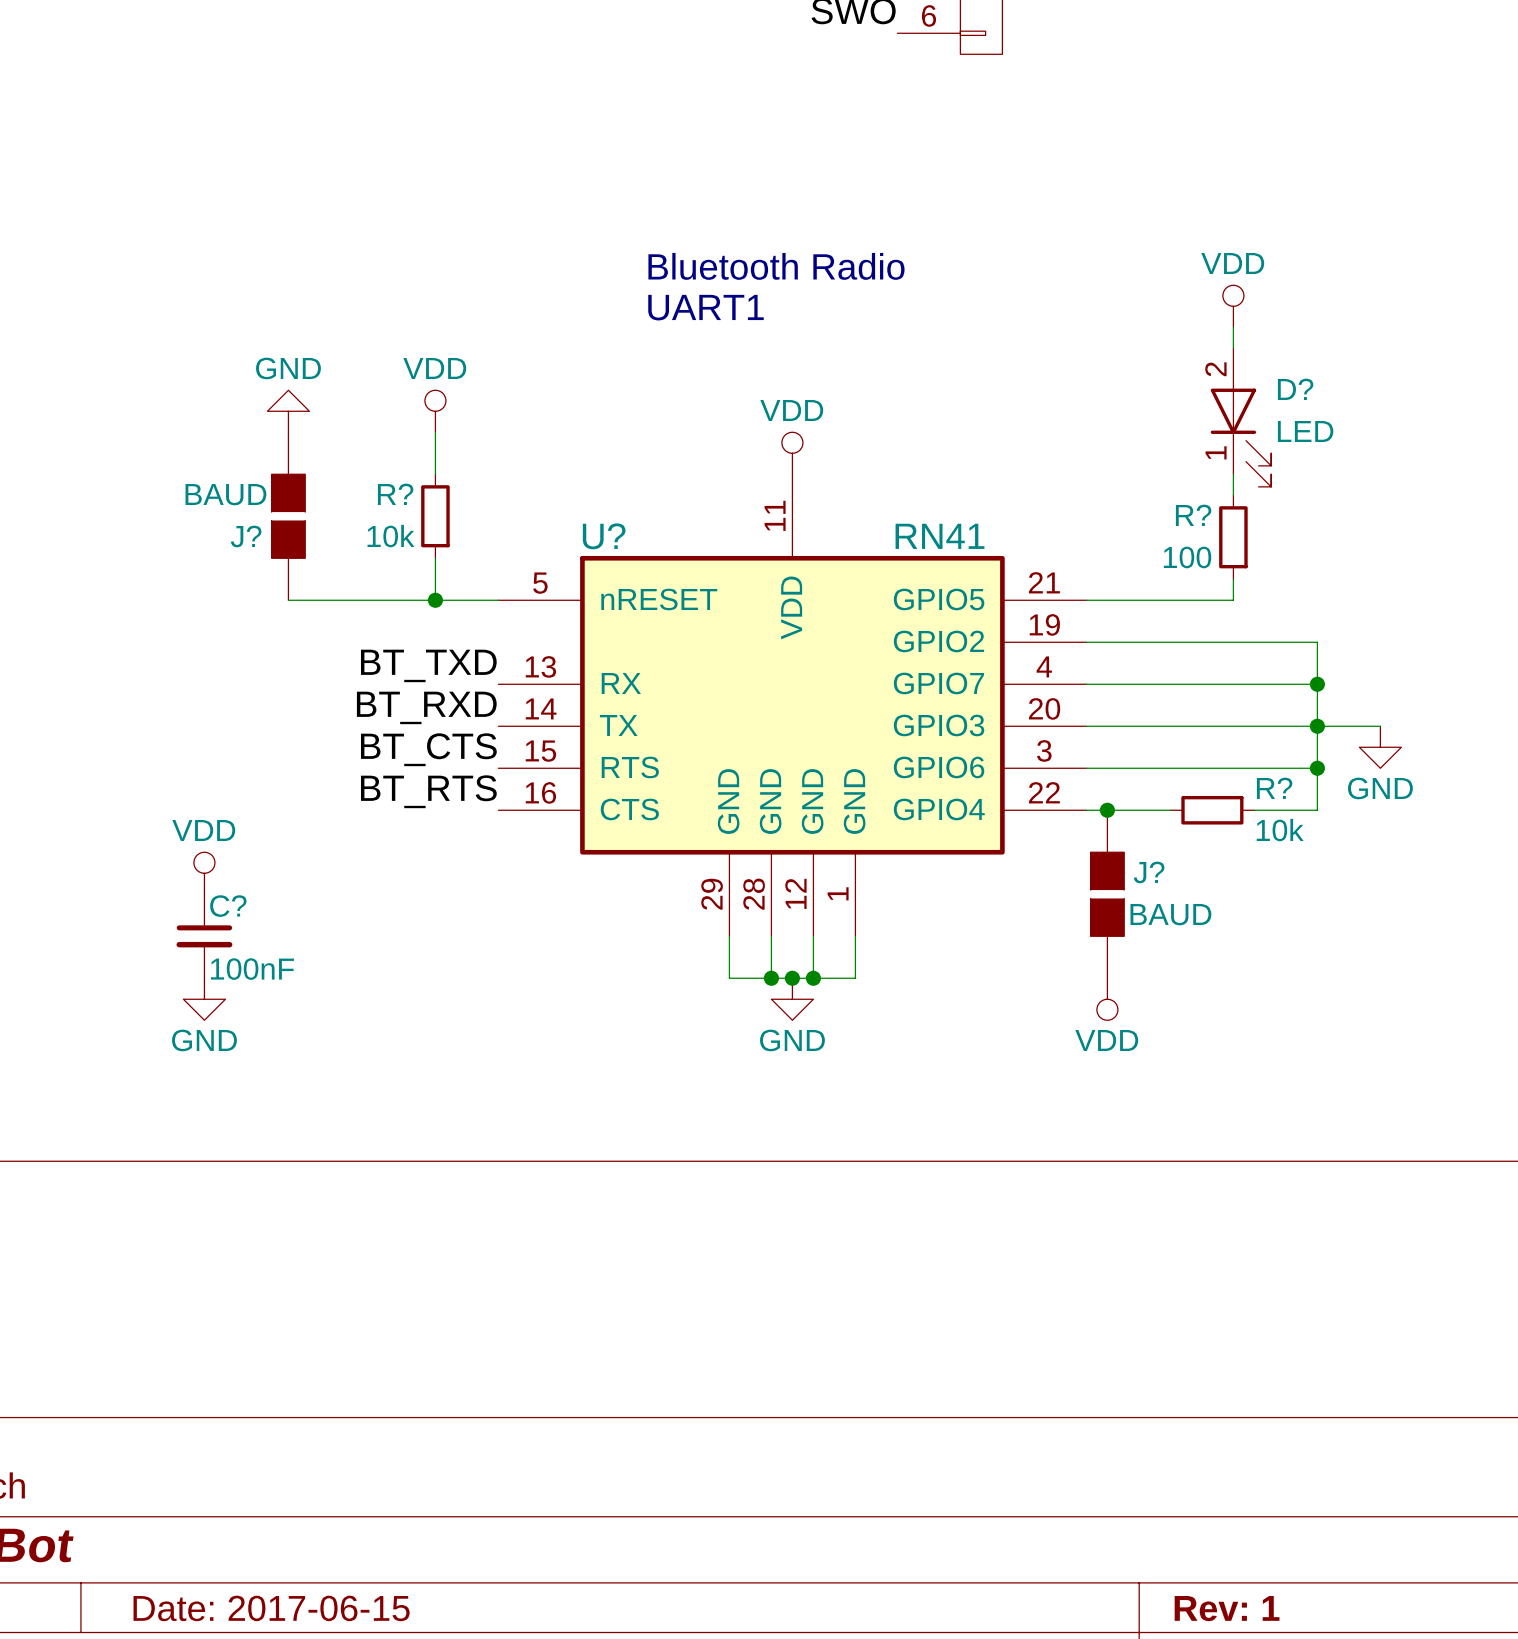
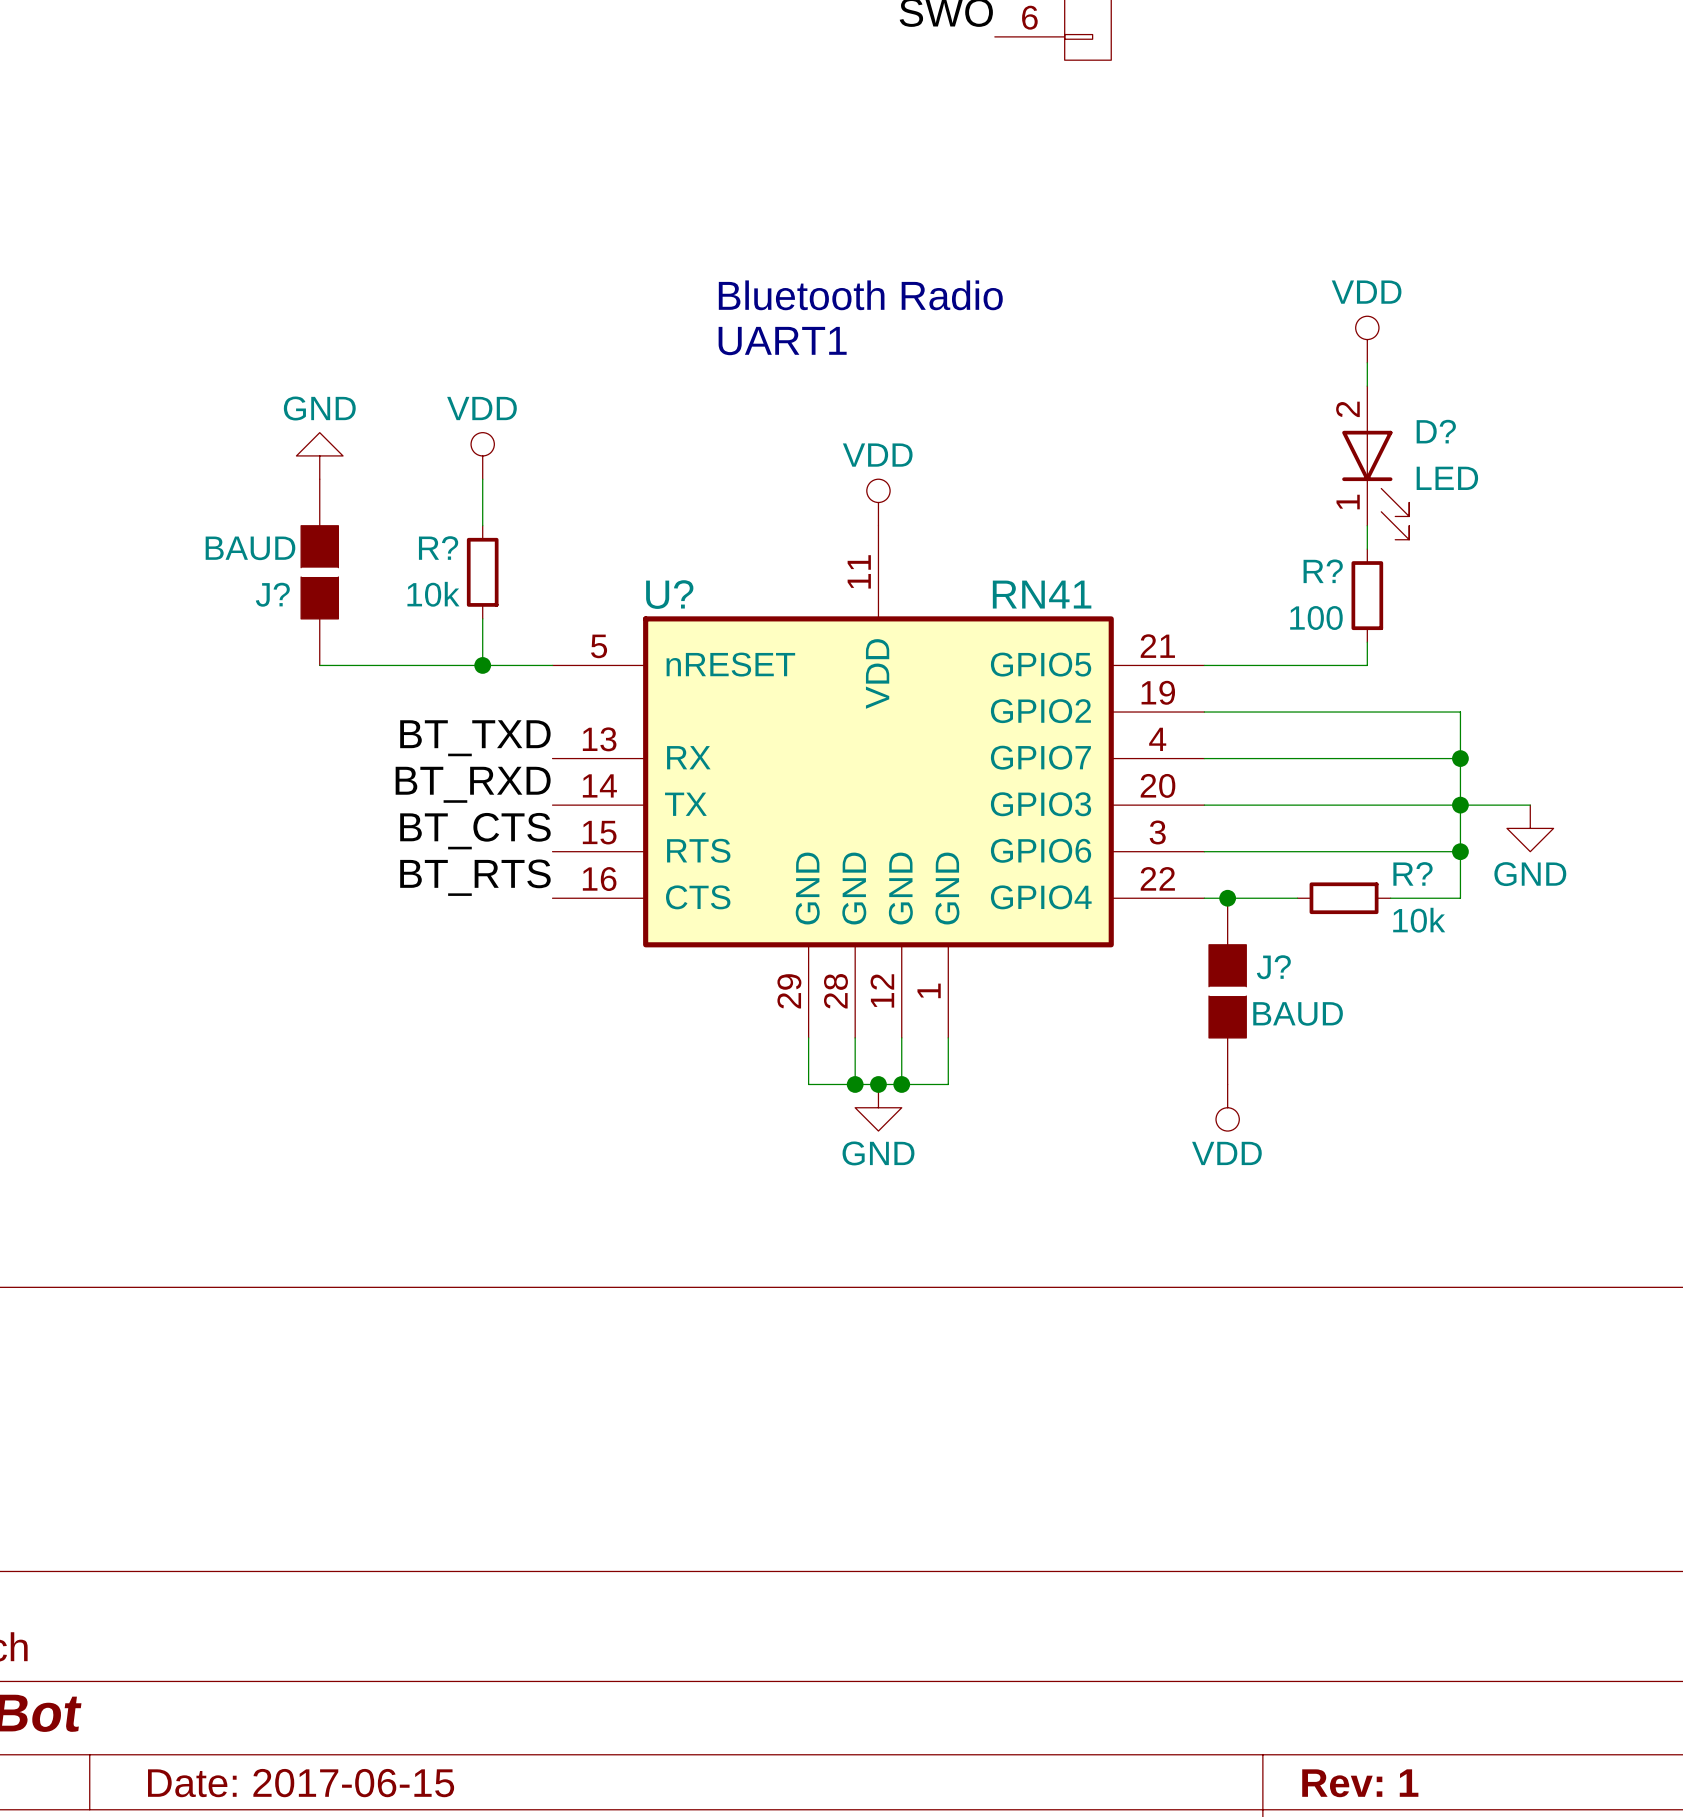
power symbol: VDD (204, 873) -> none
C?: 100nF (204, 936) -> none
power symbol: GND (204, 999) -> none

